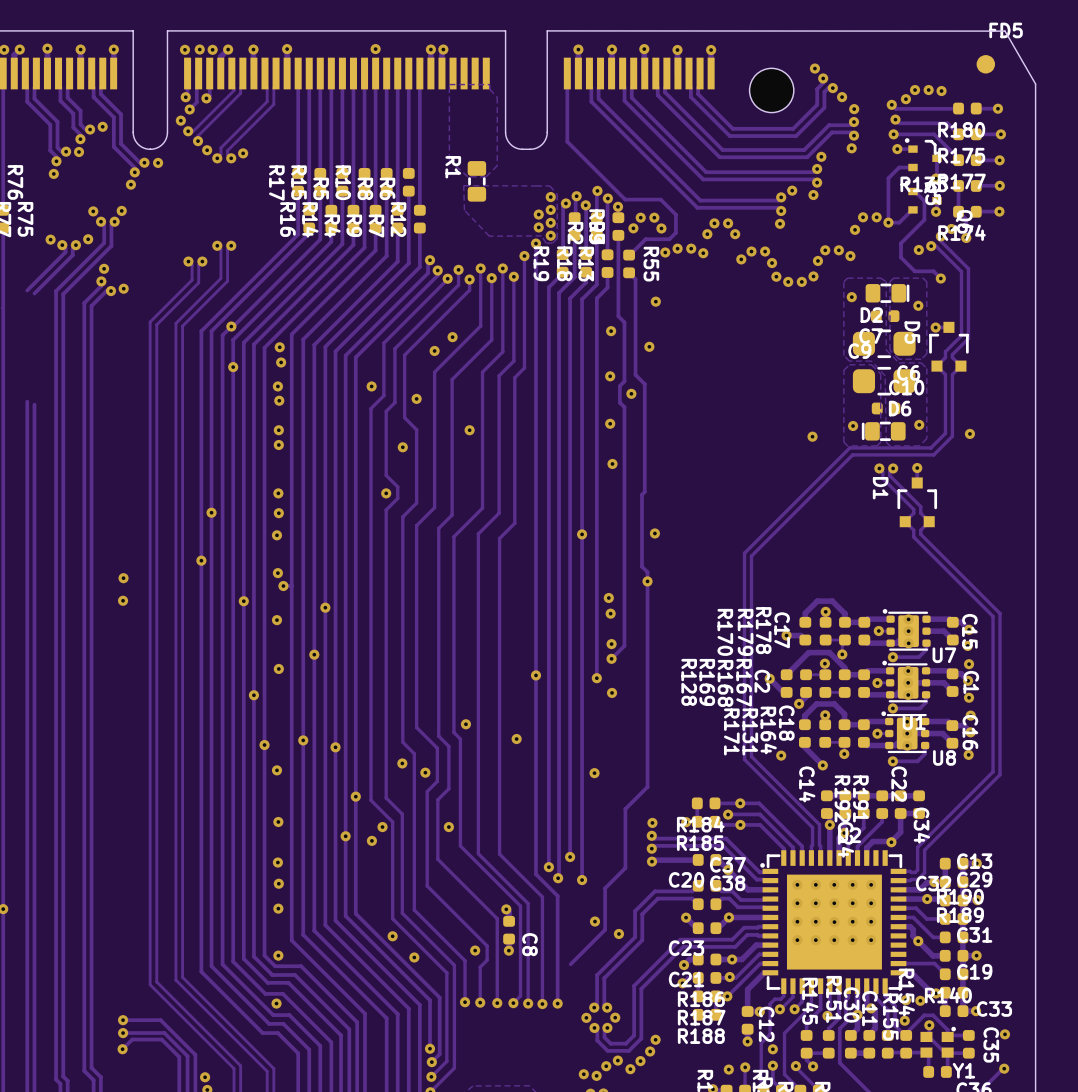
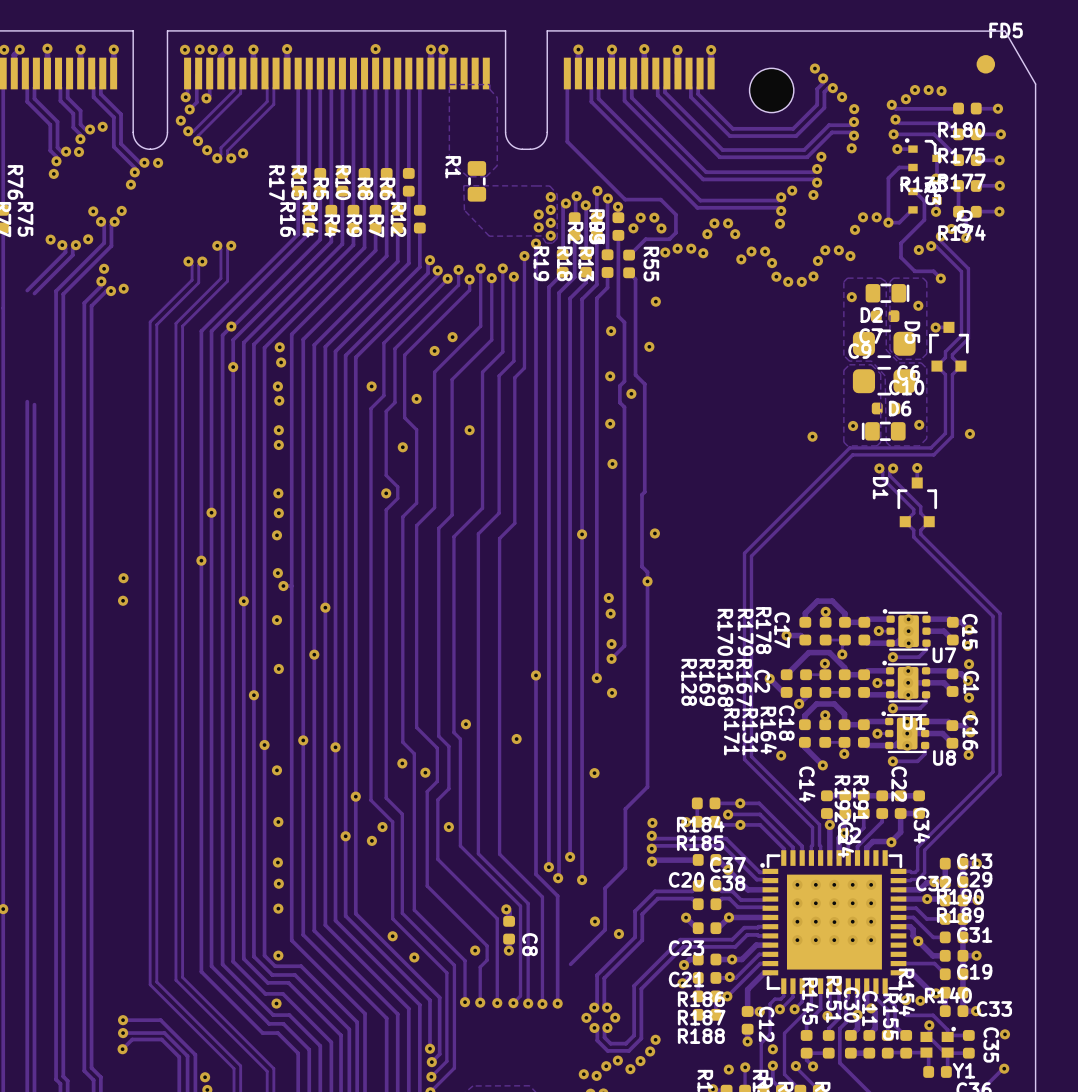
track: (924, 1015) (906, 1033) -> (924, 1015) (906, 1015)
via: (904, 1020) -> none

